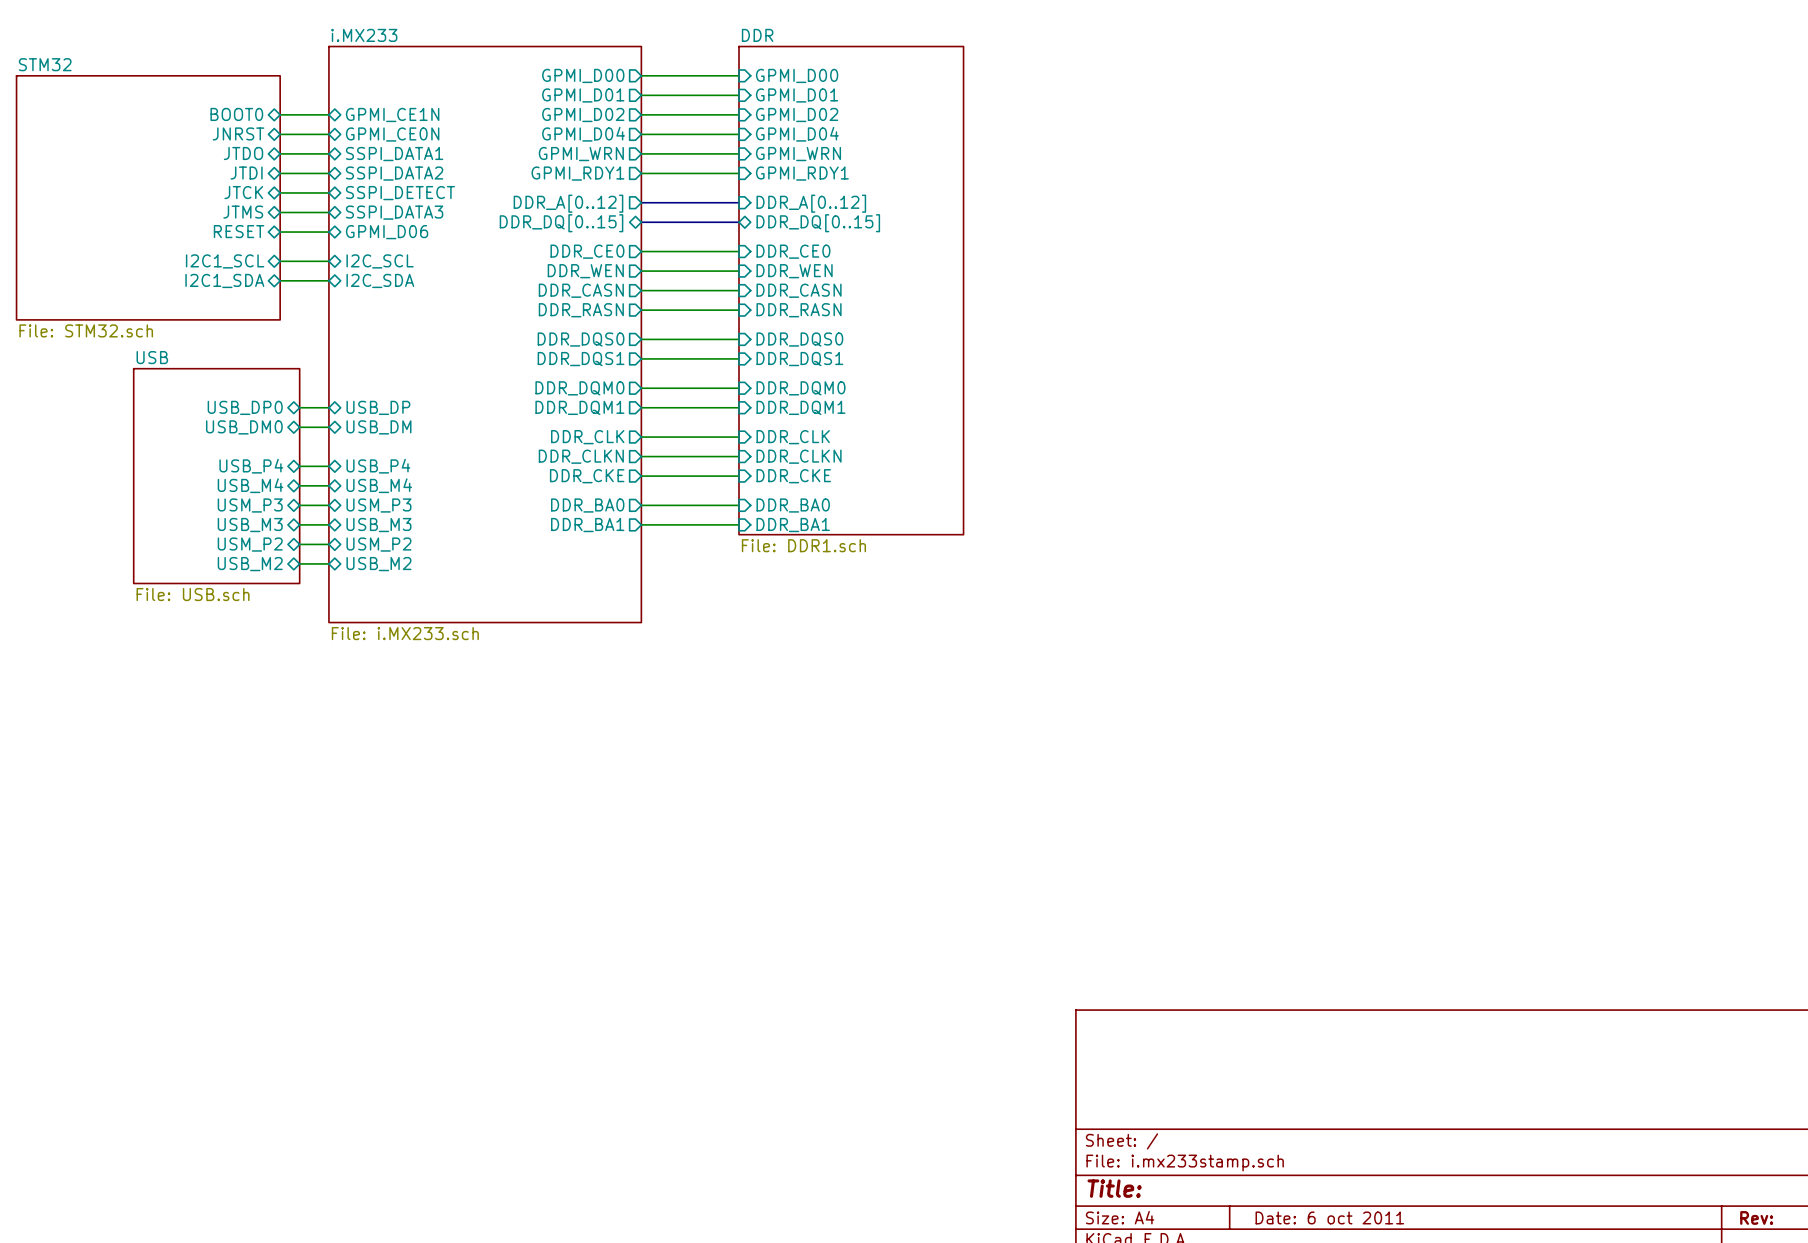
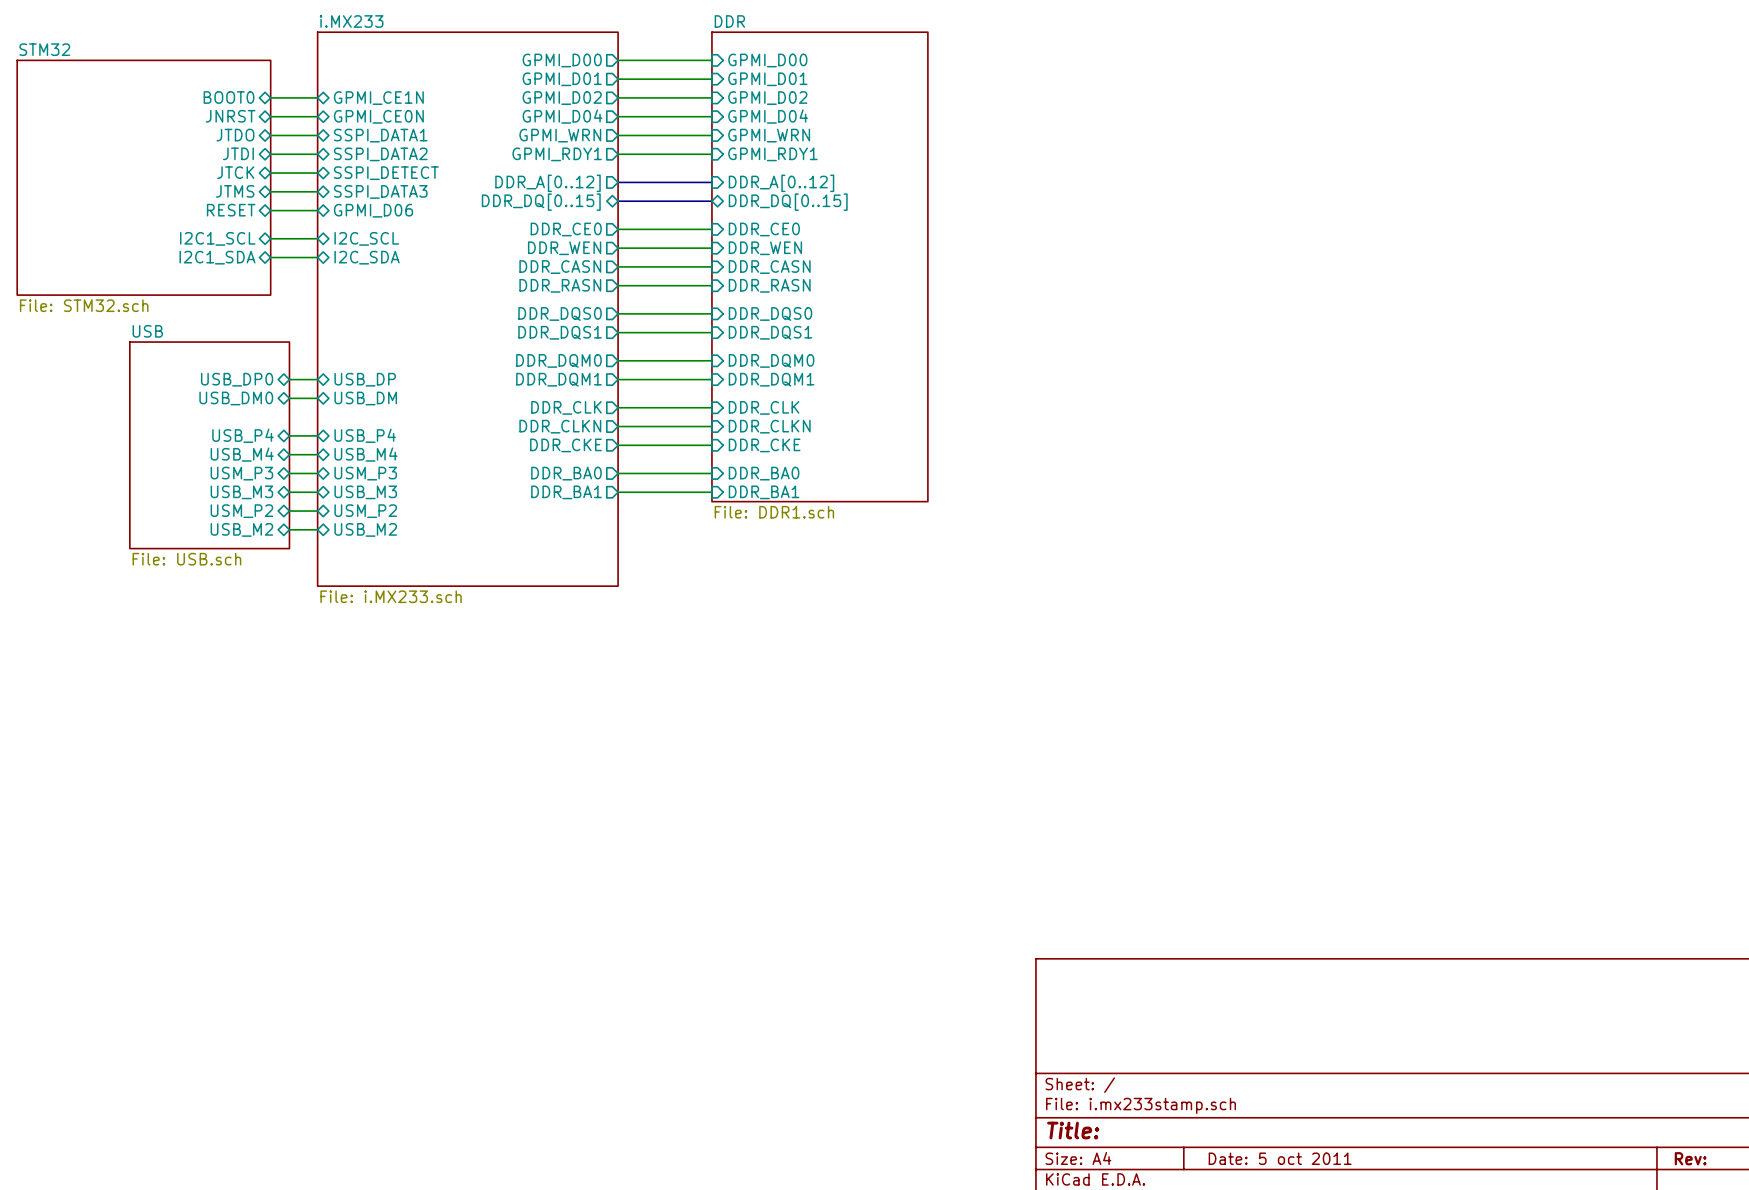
title block: Date: 6 oct 2011 (1329, 1217) -> Date: 5 oct 2011 (1280, 1158)

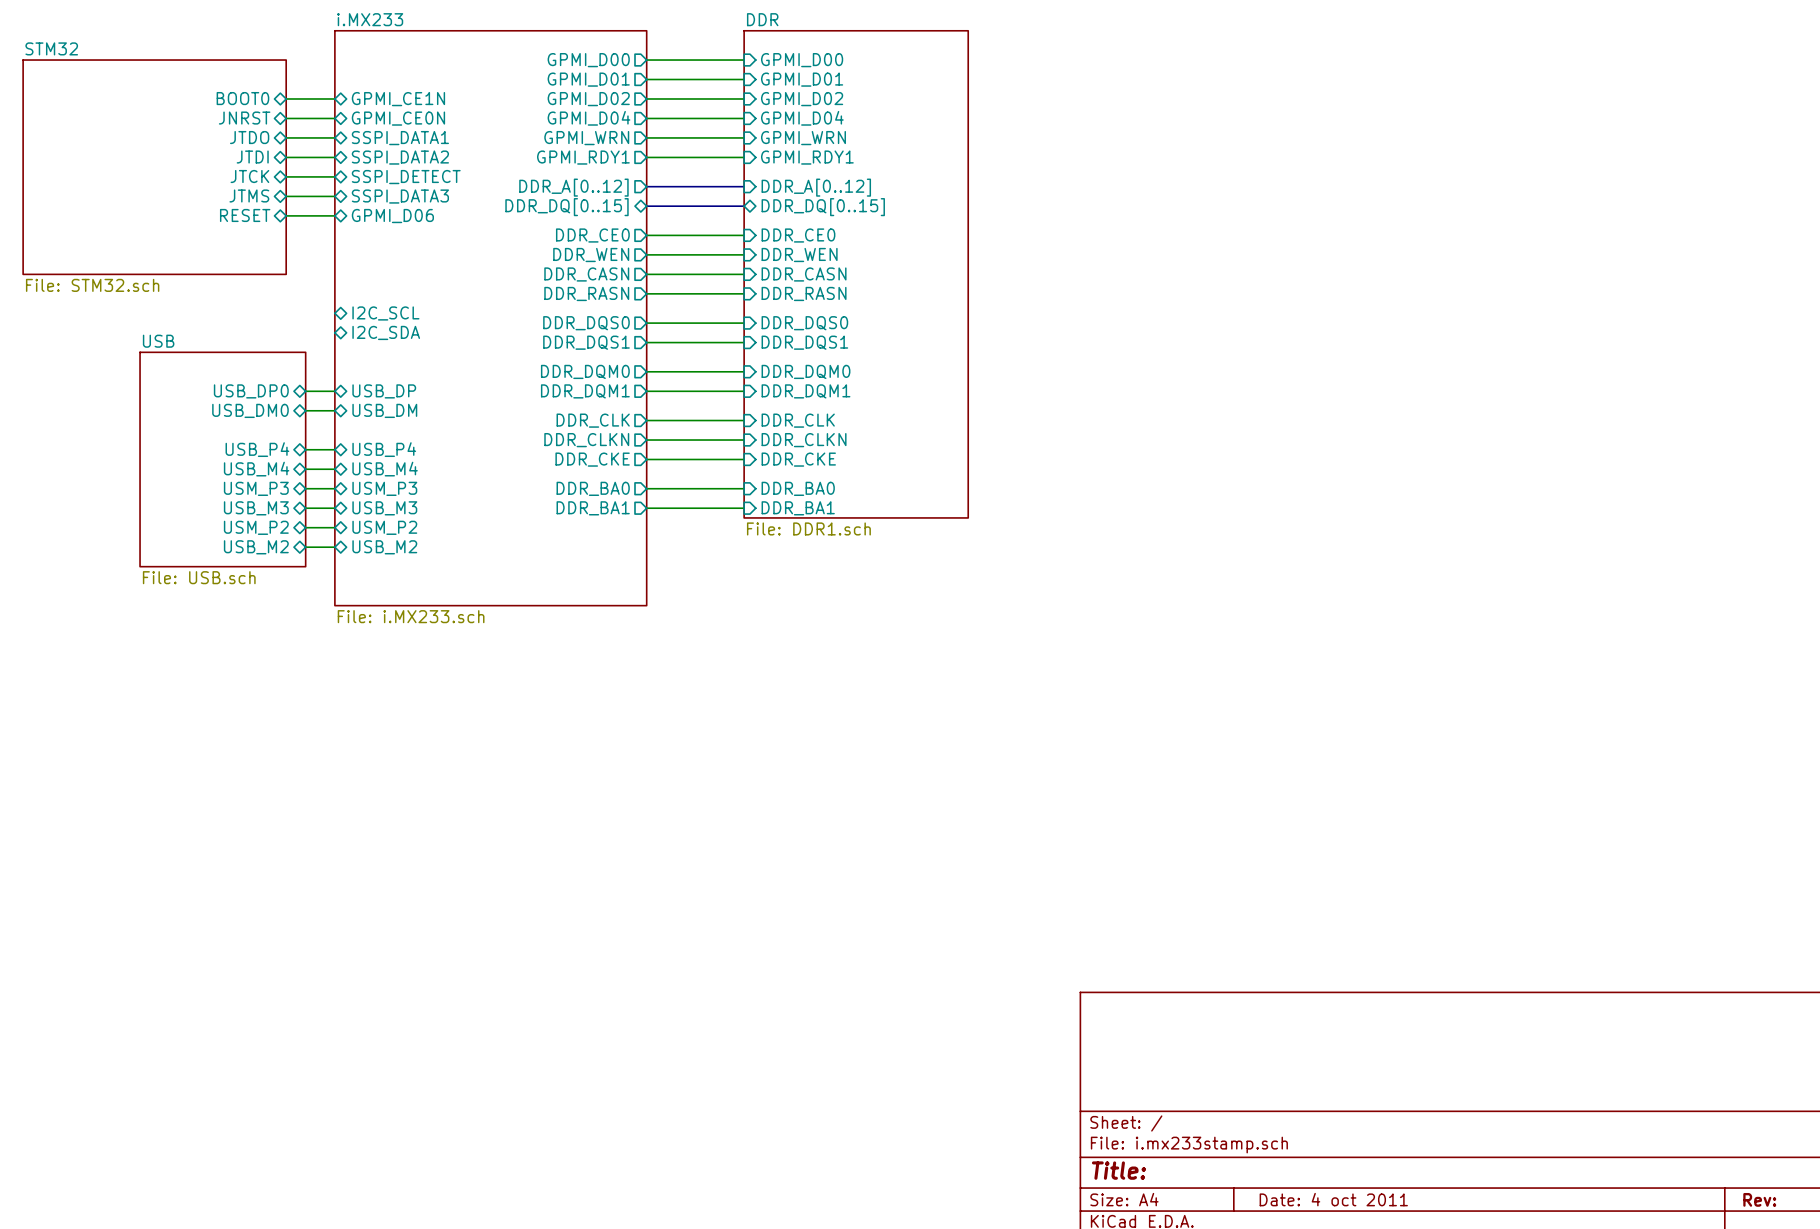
sheet STM32 shape: [17, 60, 271, 296] -> [23, 60, 287, 275]
sheet pin: I2C1_SCL (217, 238) -> none
wire: (270, 238) (317, 238) -> none
sheet pin position: I2C_SCL (366, 238) -> I2C_SCL (385, 313)
sheet pin: I2C1_SDA (217, 257) -> none
wire: (270, 257) (317, 257) -> none
sheet pin position: I2C_SDA (367, 257) -> I2C_SDA (386, 332)
title block: Date: 5 oct 2011 (1280, 1158) -> Date: 4 oct 2011 (1333, 1199)

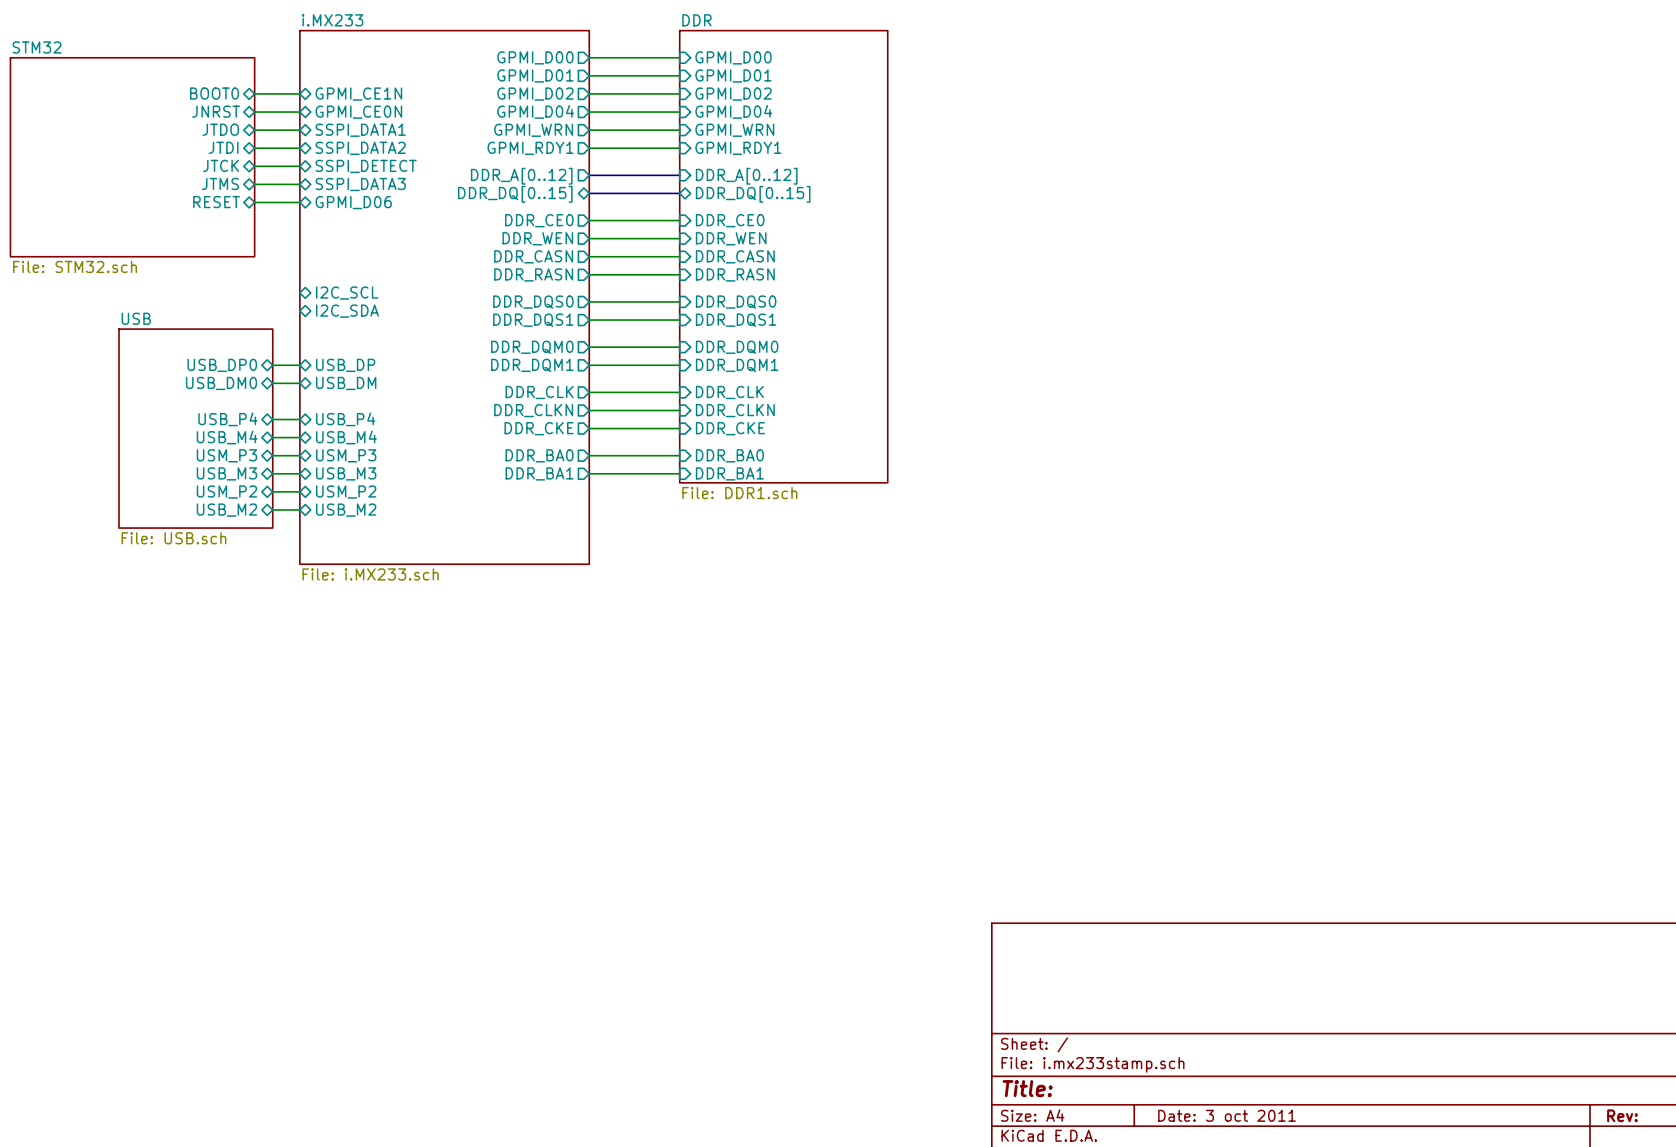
title block: Date: 4 oct 2011 (1333, 1199) -> Date: 3 oct 2011 (1227, 1115)

